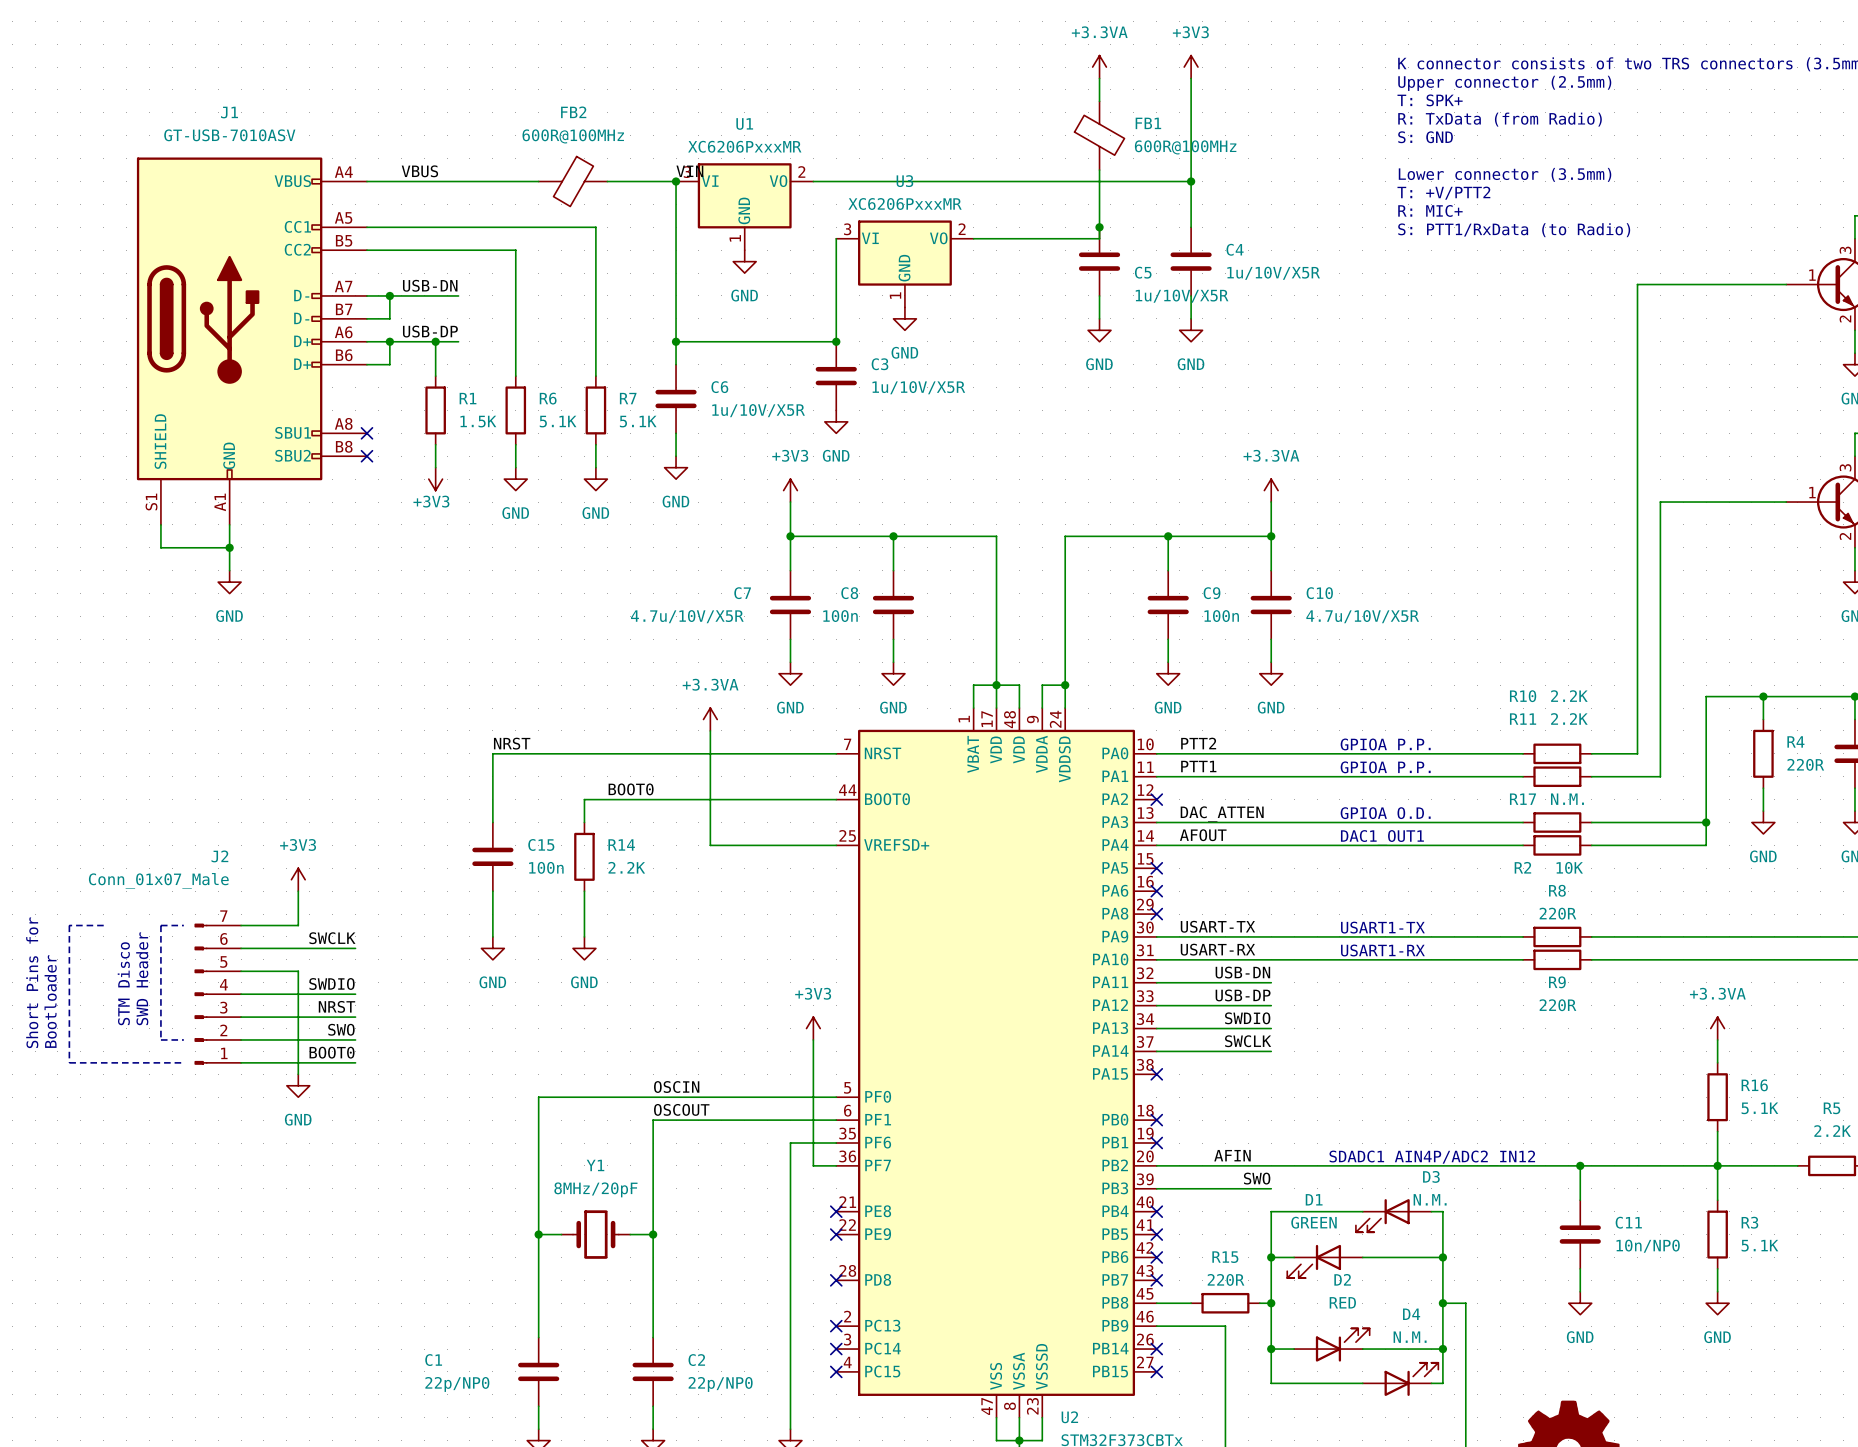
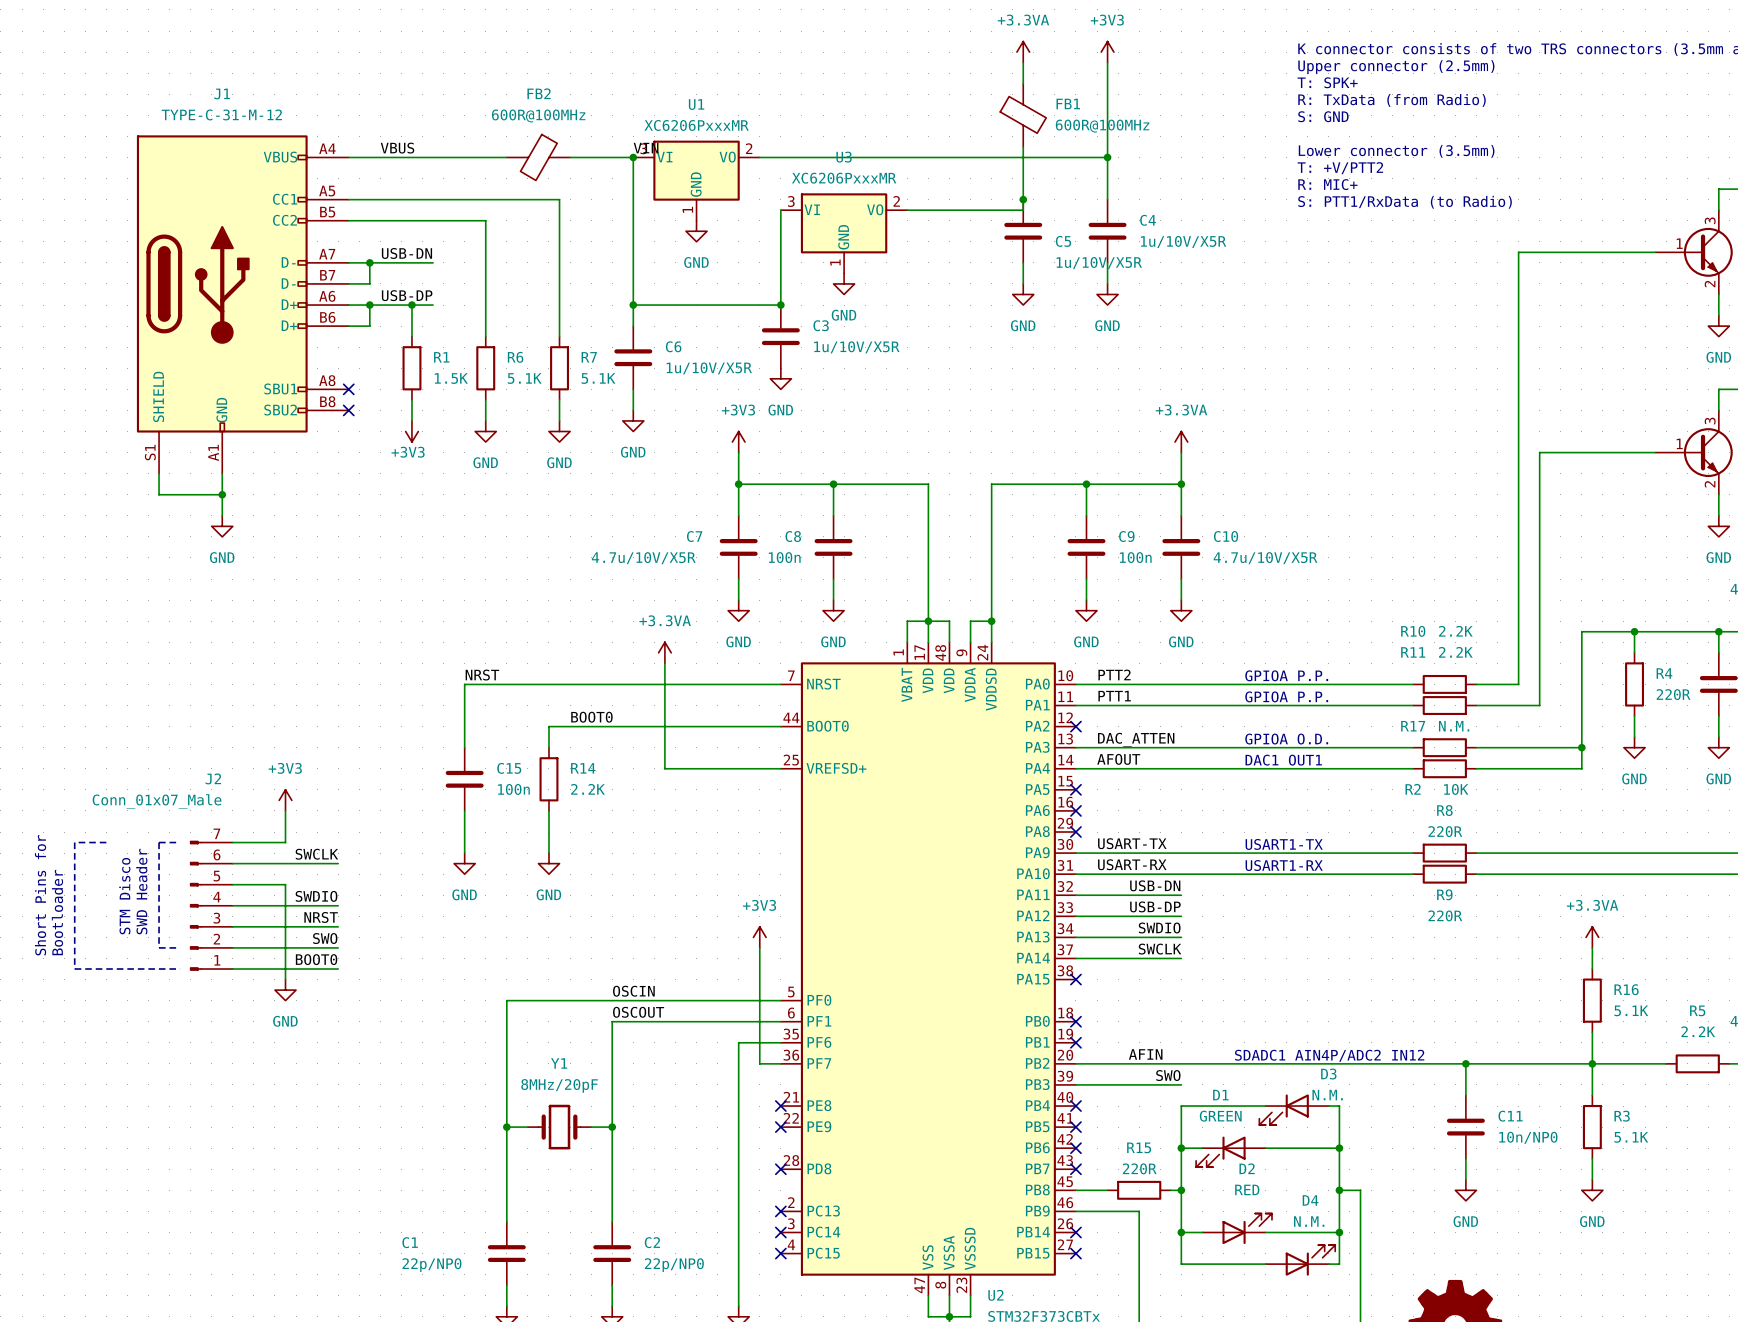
J1 value: GT-USB-7010ASV (229, 135) -> TYPE-C-31-M-12 (221, 114)

